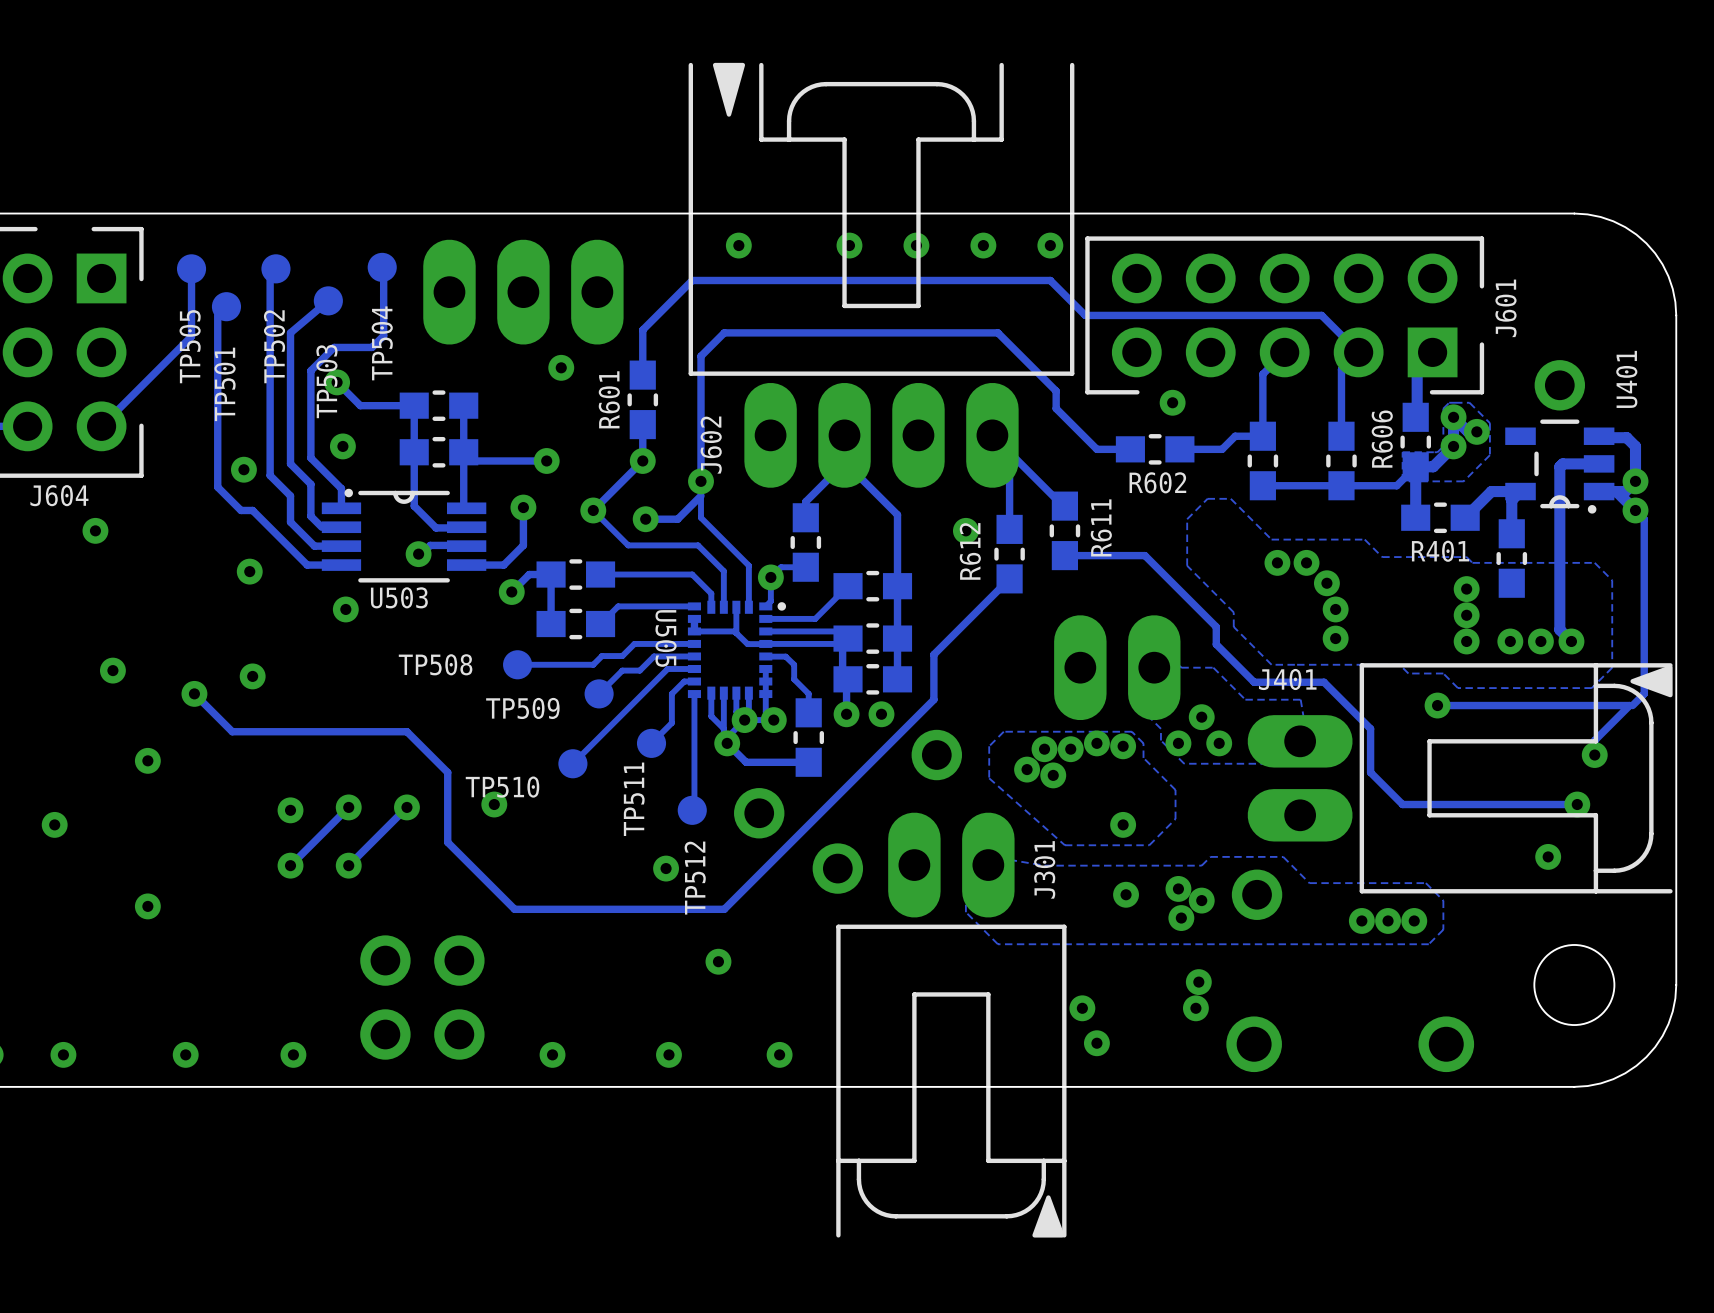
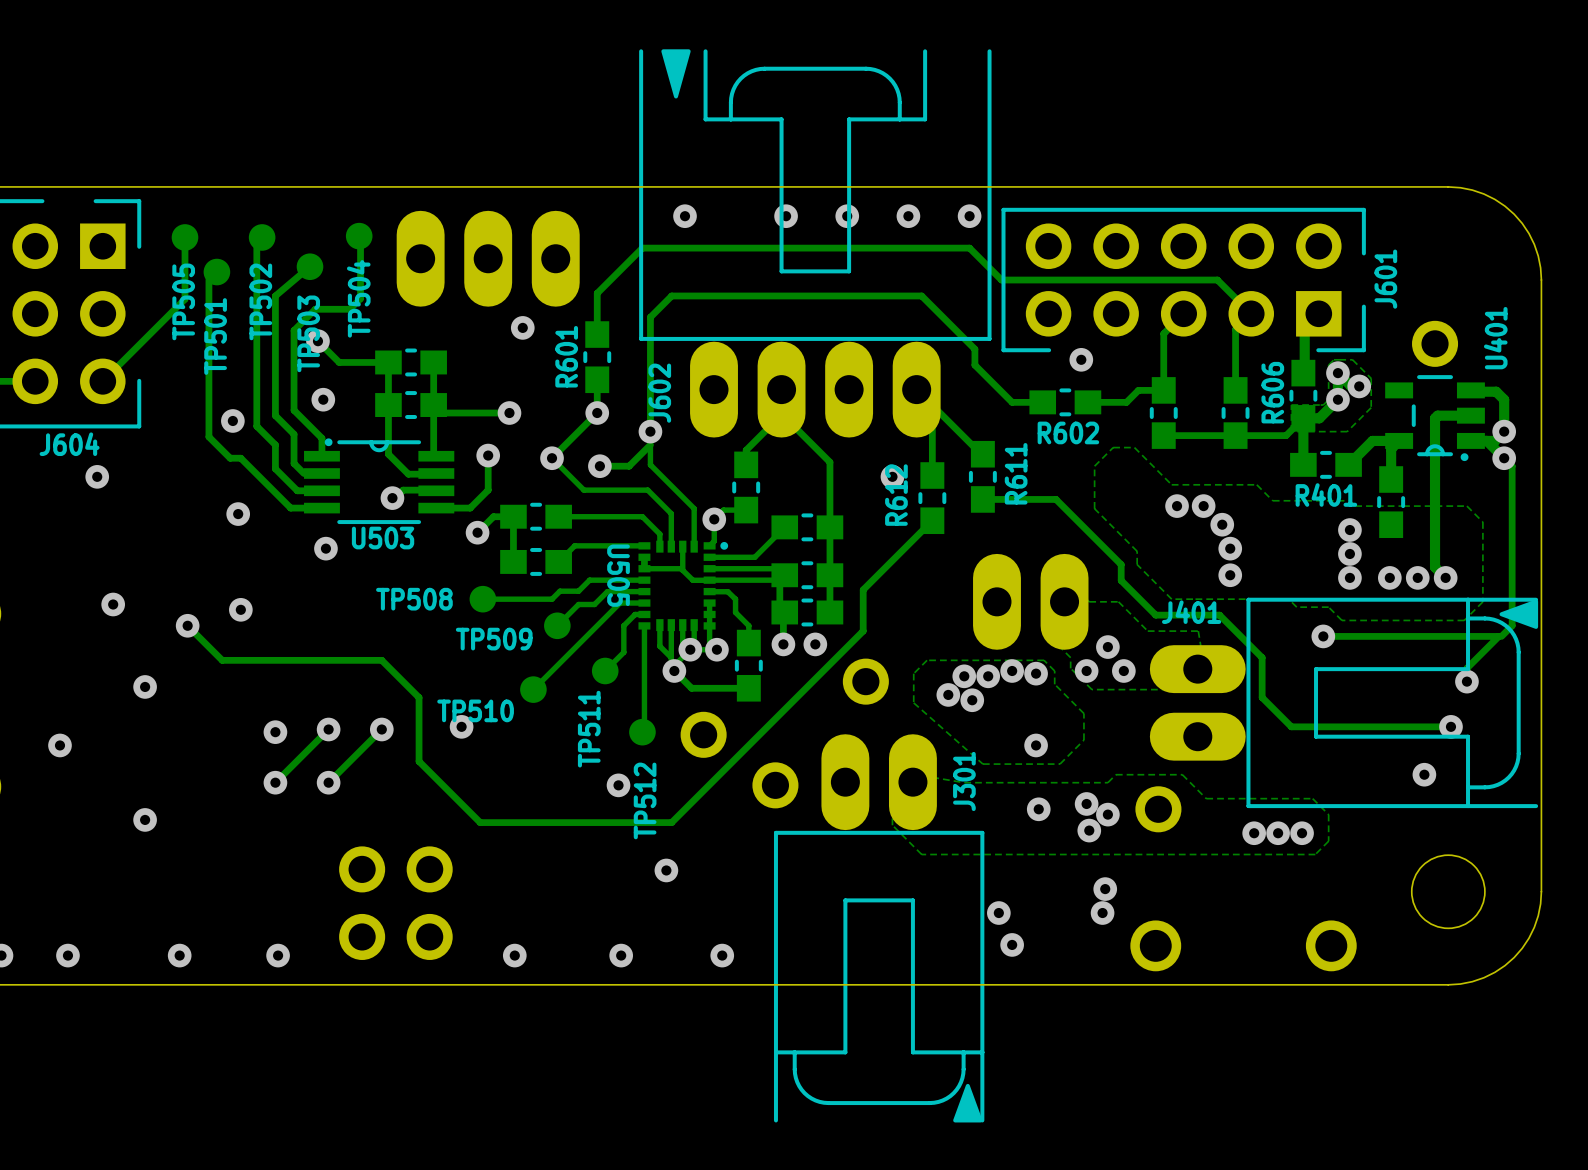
J602 footprint: [688, 62, 1075, 488] -> [639, 49, 992, 438]
J401 footprint: [1247, 663, 1673, 894] -> [1149, 597, 1539, 809]
J301 footprint: [836, 812, 1067, 1238] -> [773, 734, 985, 1123]

